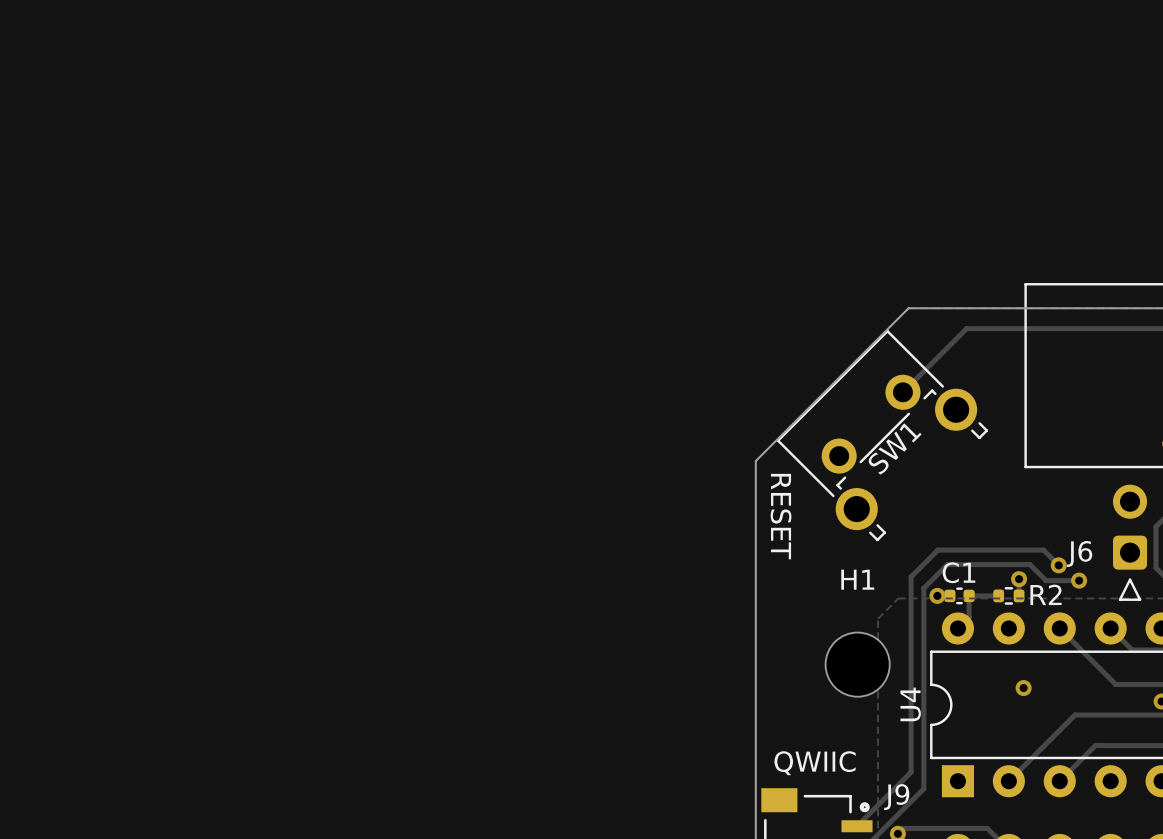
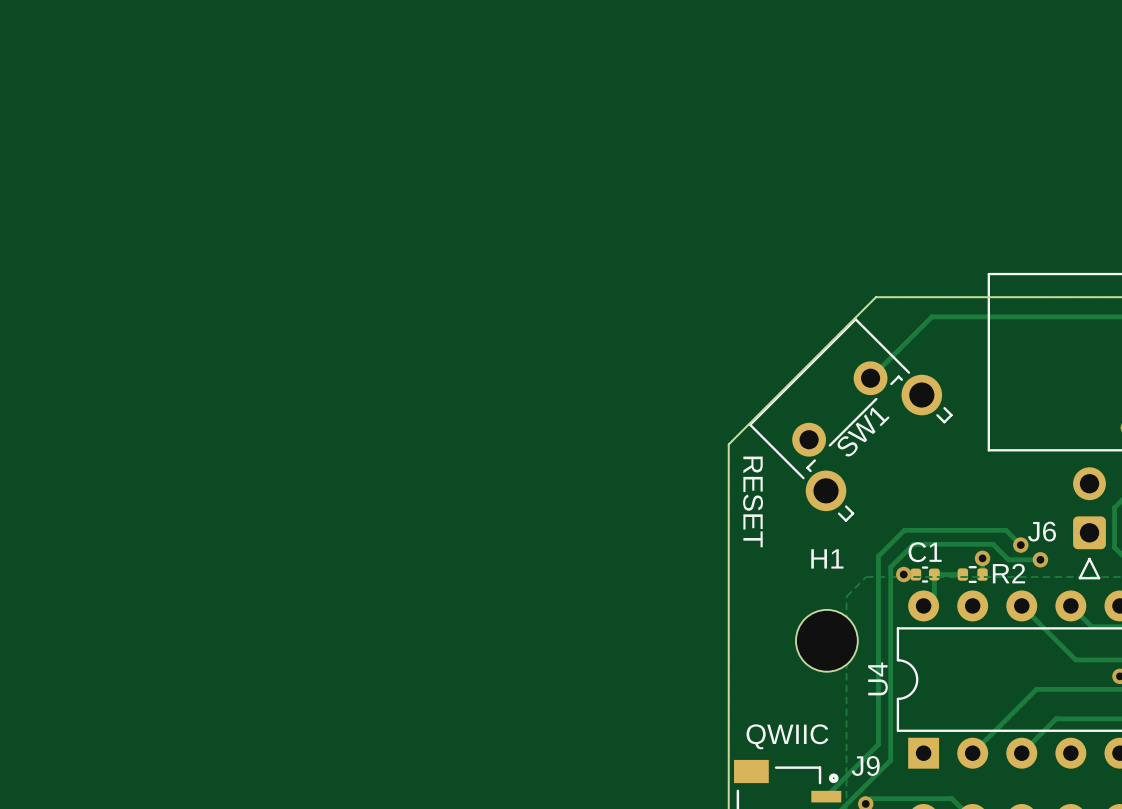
via: (1023, 688) -> none

